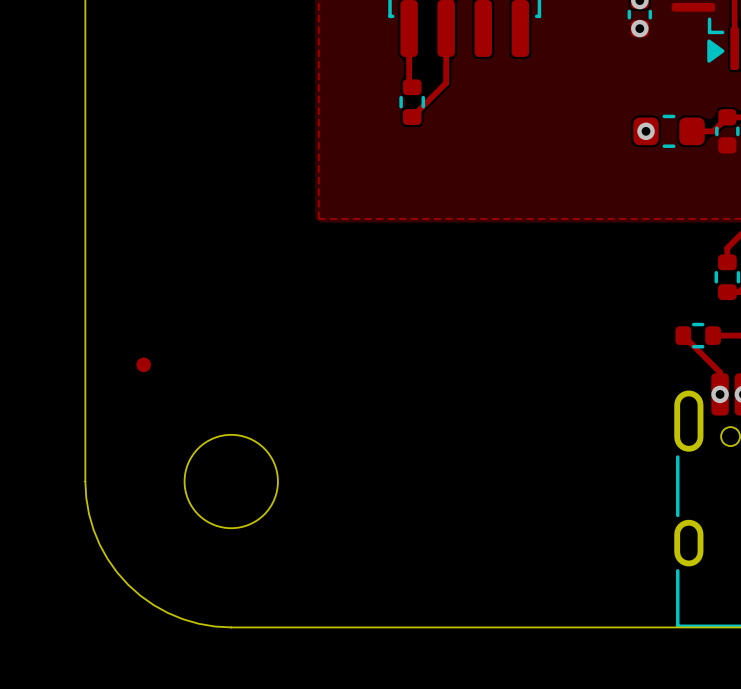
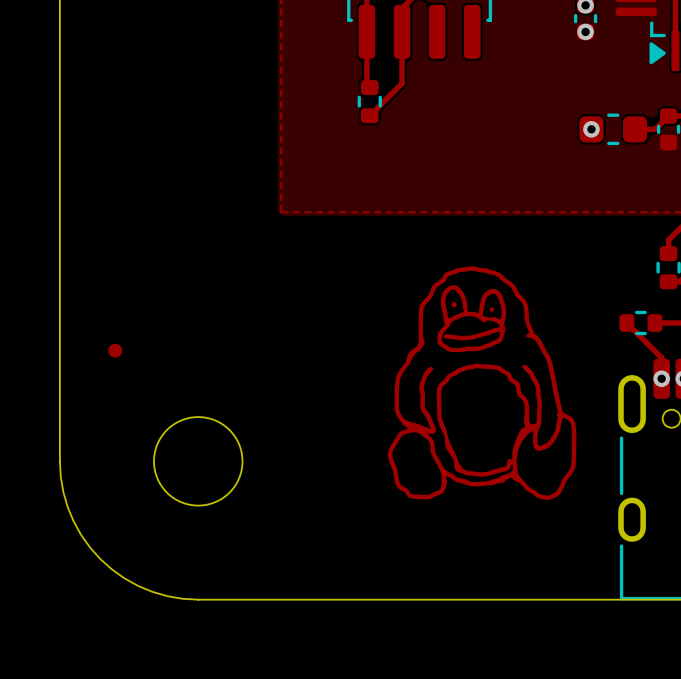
drawing: none -> [387, 266, 577, 500]

